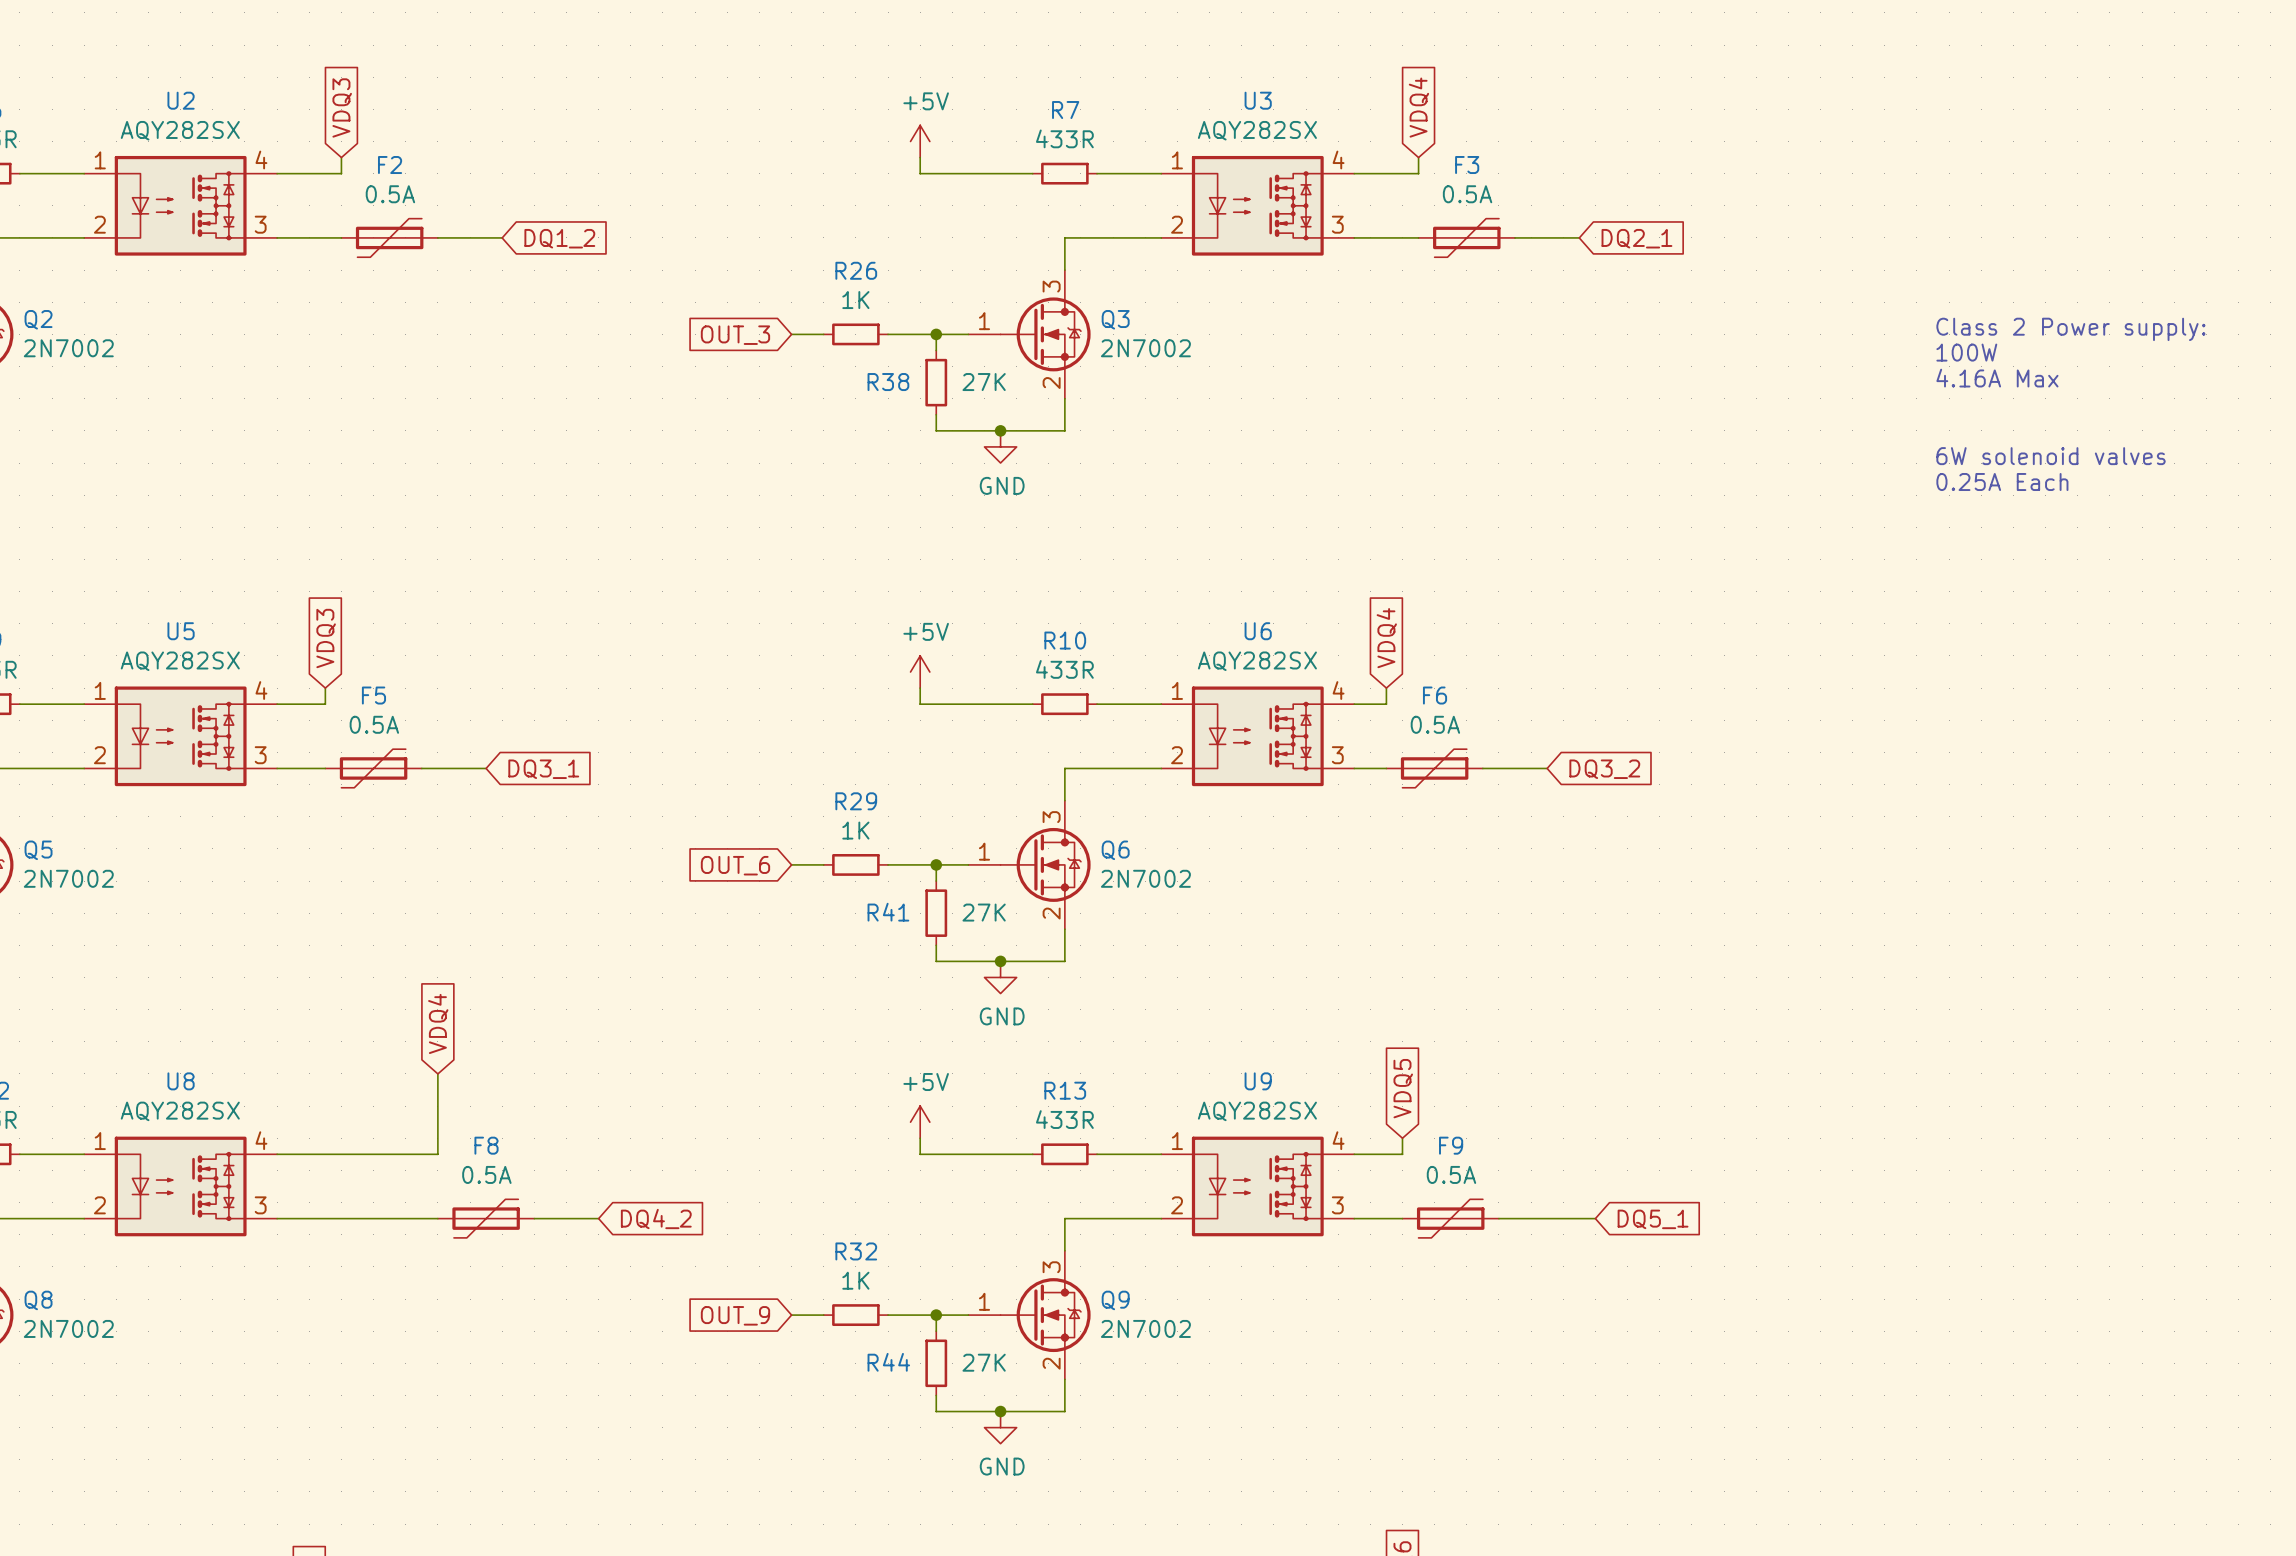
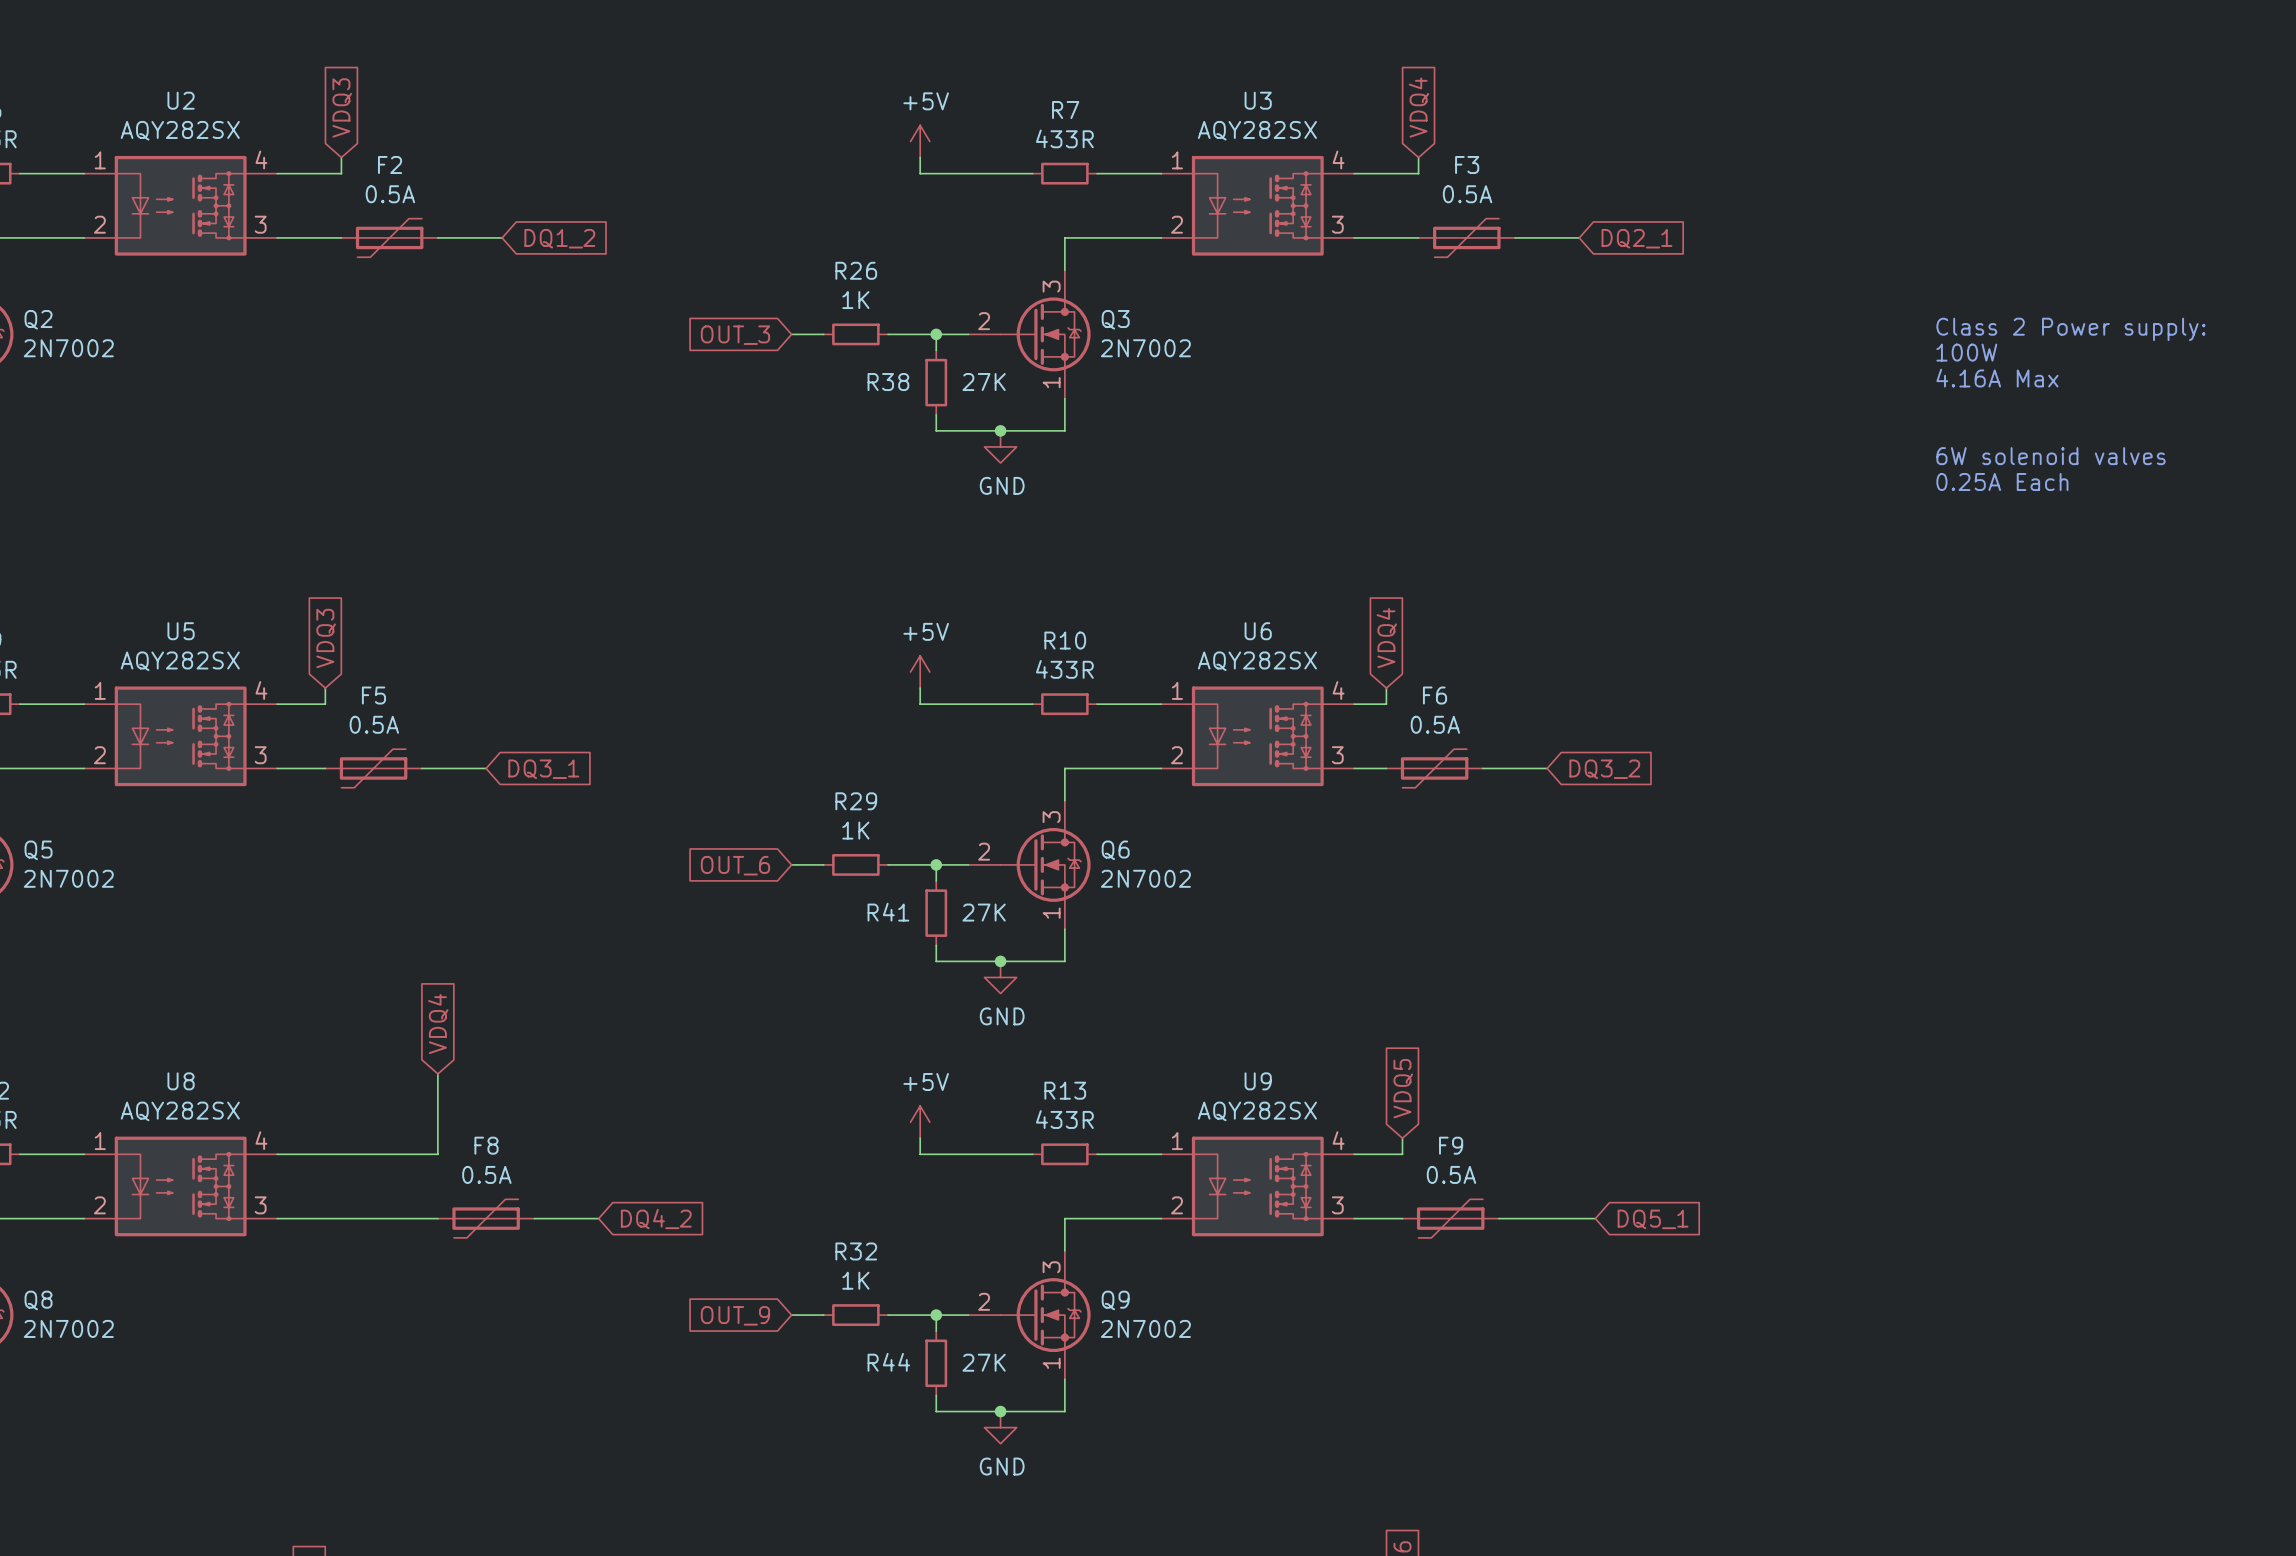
Q3 pin number: 1 (984, 321) -> 2 (984, 321)
Q3 pin number: 2 (1051, 383) -> 1 (1051, 382)
Q6 pin number: 1 (984, 851) -> 2 (984, 851)
Q6 pin number: 2 (1051, 913) -> 1 (1051, 913)
Q9 pin number: 1 (984, 1301) -> 2 (984, 1301)
Q9 pin number: 2 (1051, 1363) -> 1 (1051, 1363)

